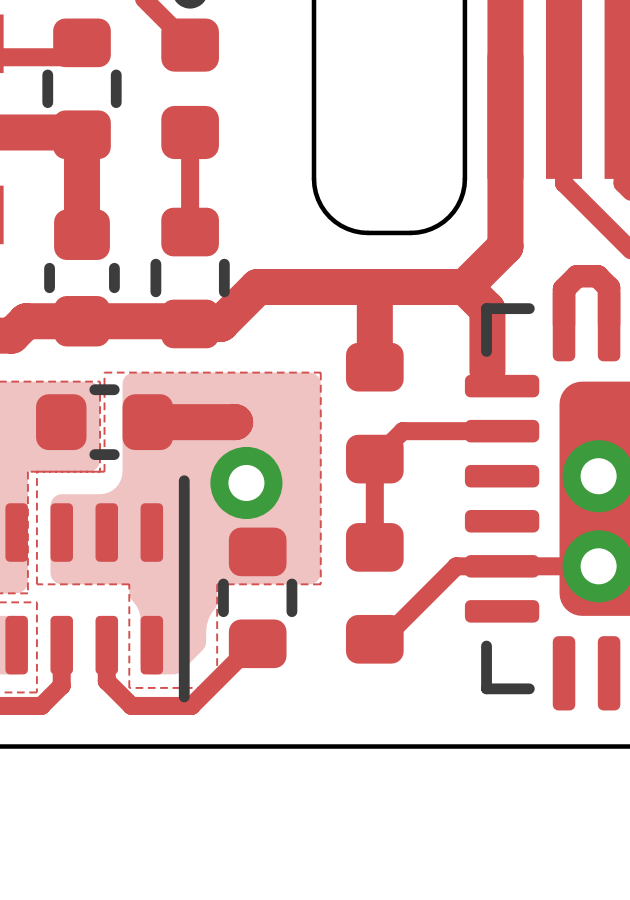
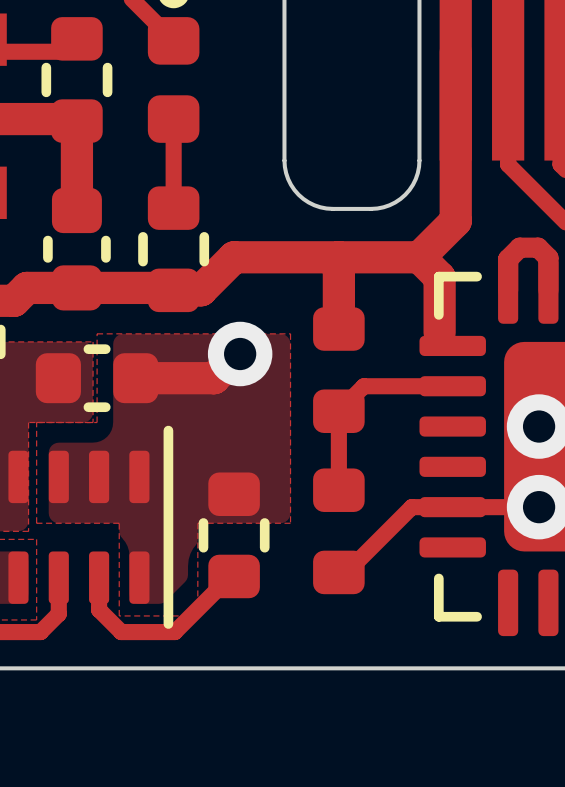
via position: (246, 482) -> (240, 354)

